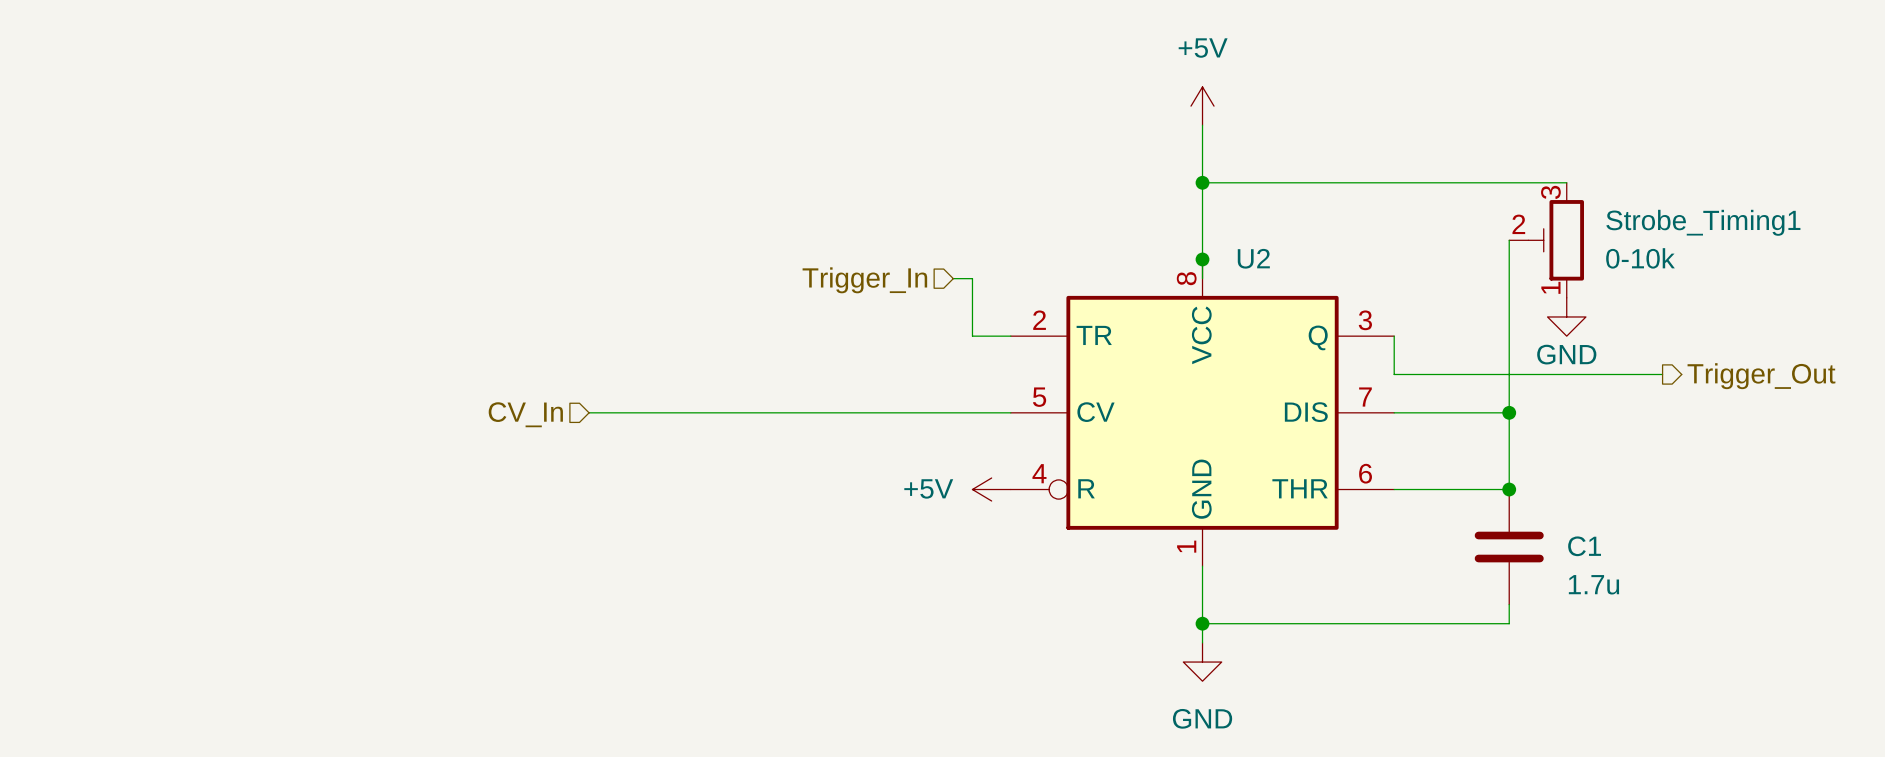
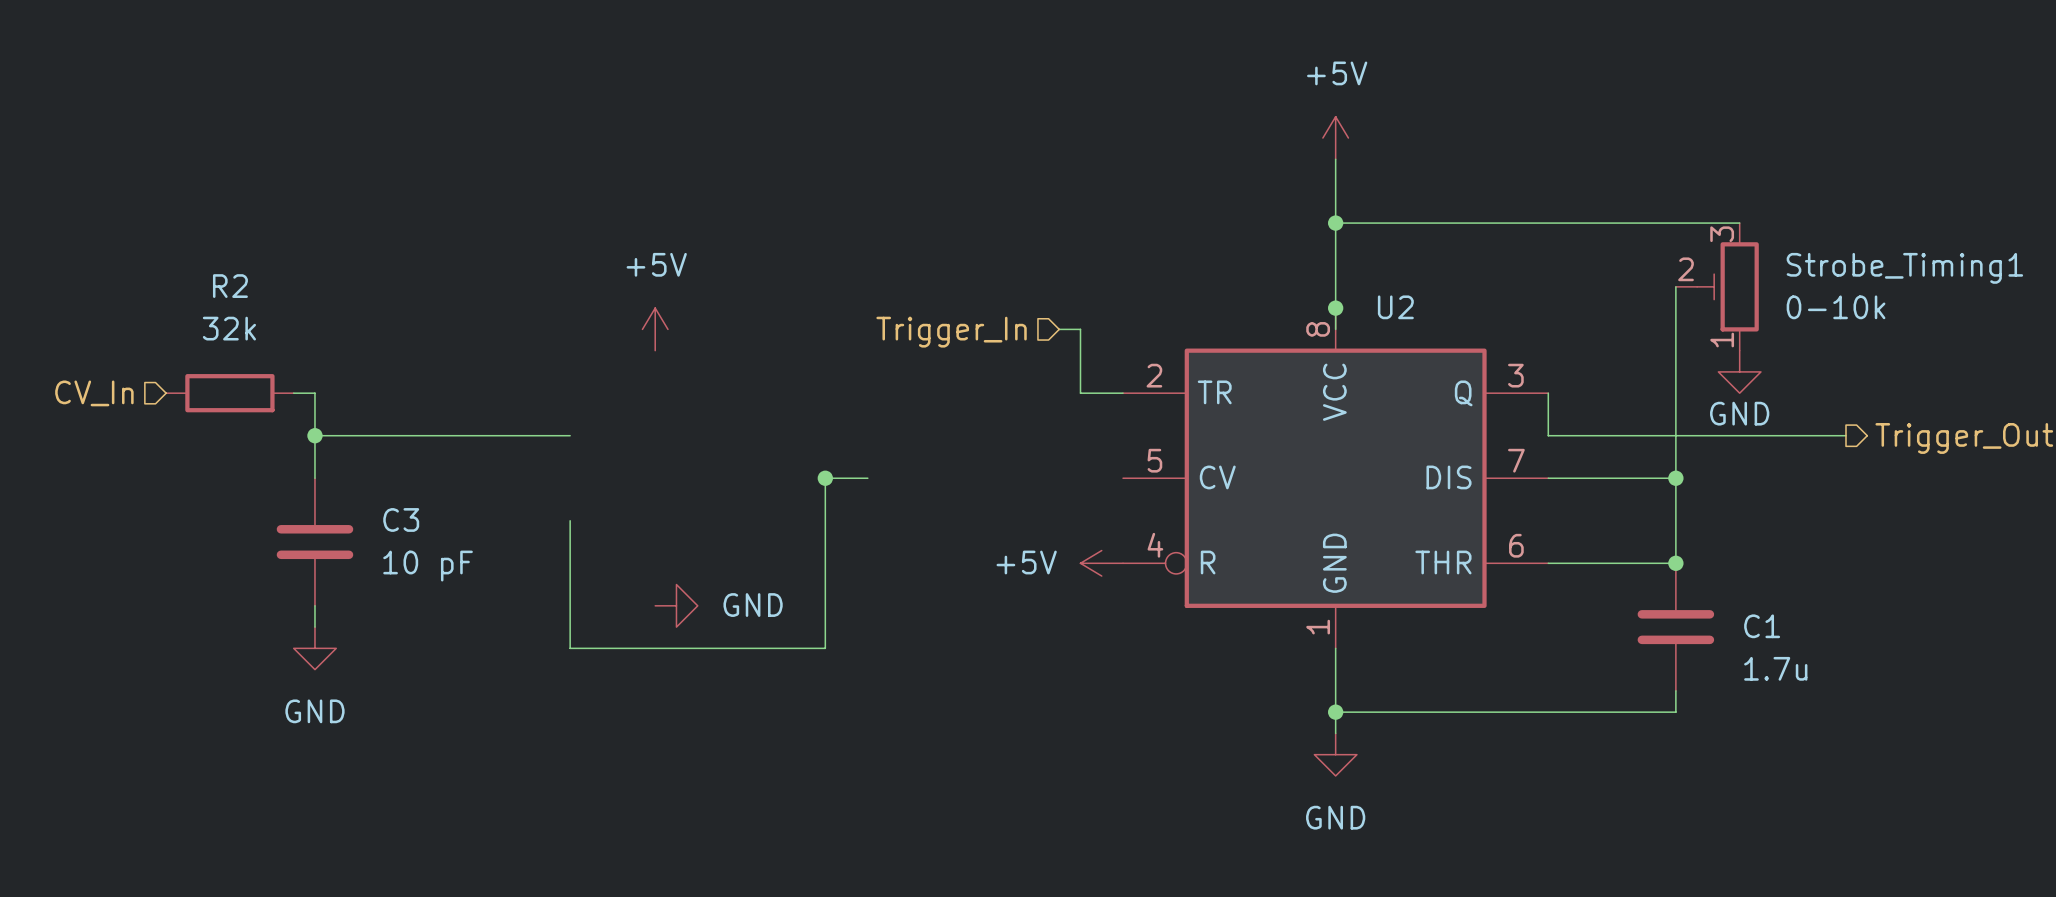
power symbol: none -> +5V (655, 329)
R2: none -> 32k (229, 393)
wire: none -> (293, 393) (314, 393) (314, 478)
hierarchical label: none -> CV_In (94, 393)
wire: none -> (314, 435) (570, 435)
junction: none -> (314, 435)
wire: (589, 412) (742, 412) -> (570, 520) (570, 648) (825, 648) (825, 478)
junction: none -> (825, 478)
wire: (780, 412) (1010, 412) -> none
hierarchical label: CV_In (525, 414) -> none
C3: none -> 10 pF (314, 542)
wire: none -> (314, 605) (314, 627)
power symbol: none -> GND (676, 605)
power symbol: none -> GND (314, 648)

